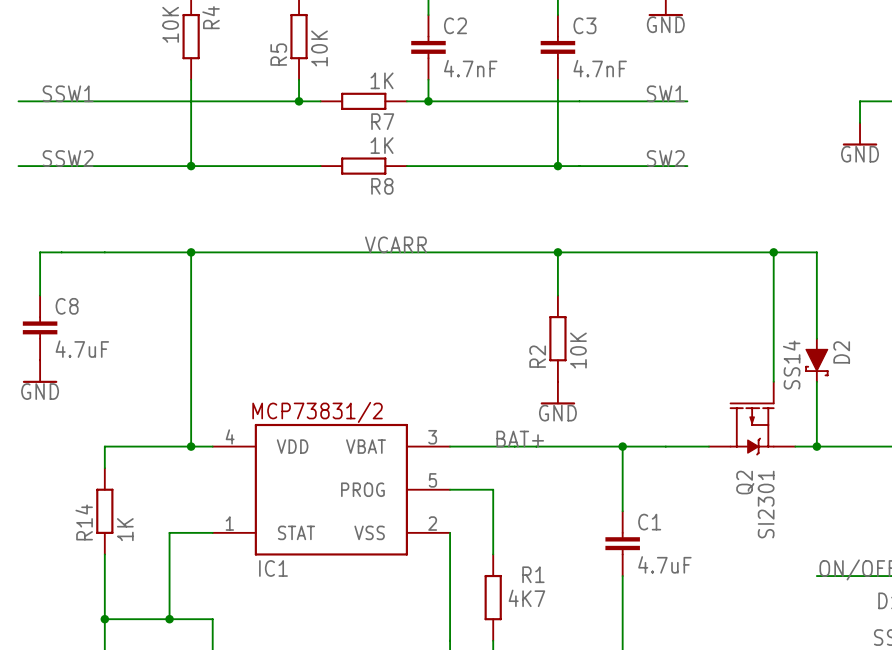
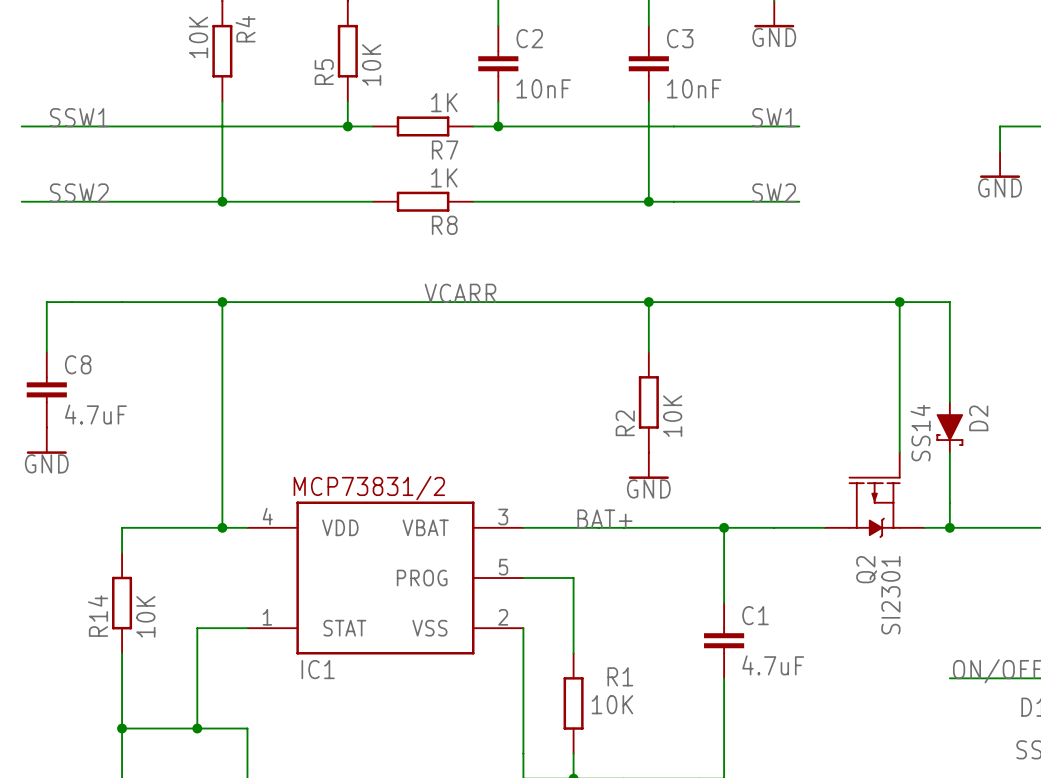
C2 value: 4.7nF (470, 68) -> 10nF (543, 88)
C3 value: 4.7nF (600, 68) -> 10nF (694, 88)
R14 value: 1K (125, 529) -> 10K (145, 616)
R1 value: 4K7 (526, 598) -> 10K (612, 704)

